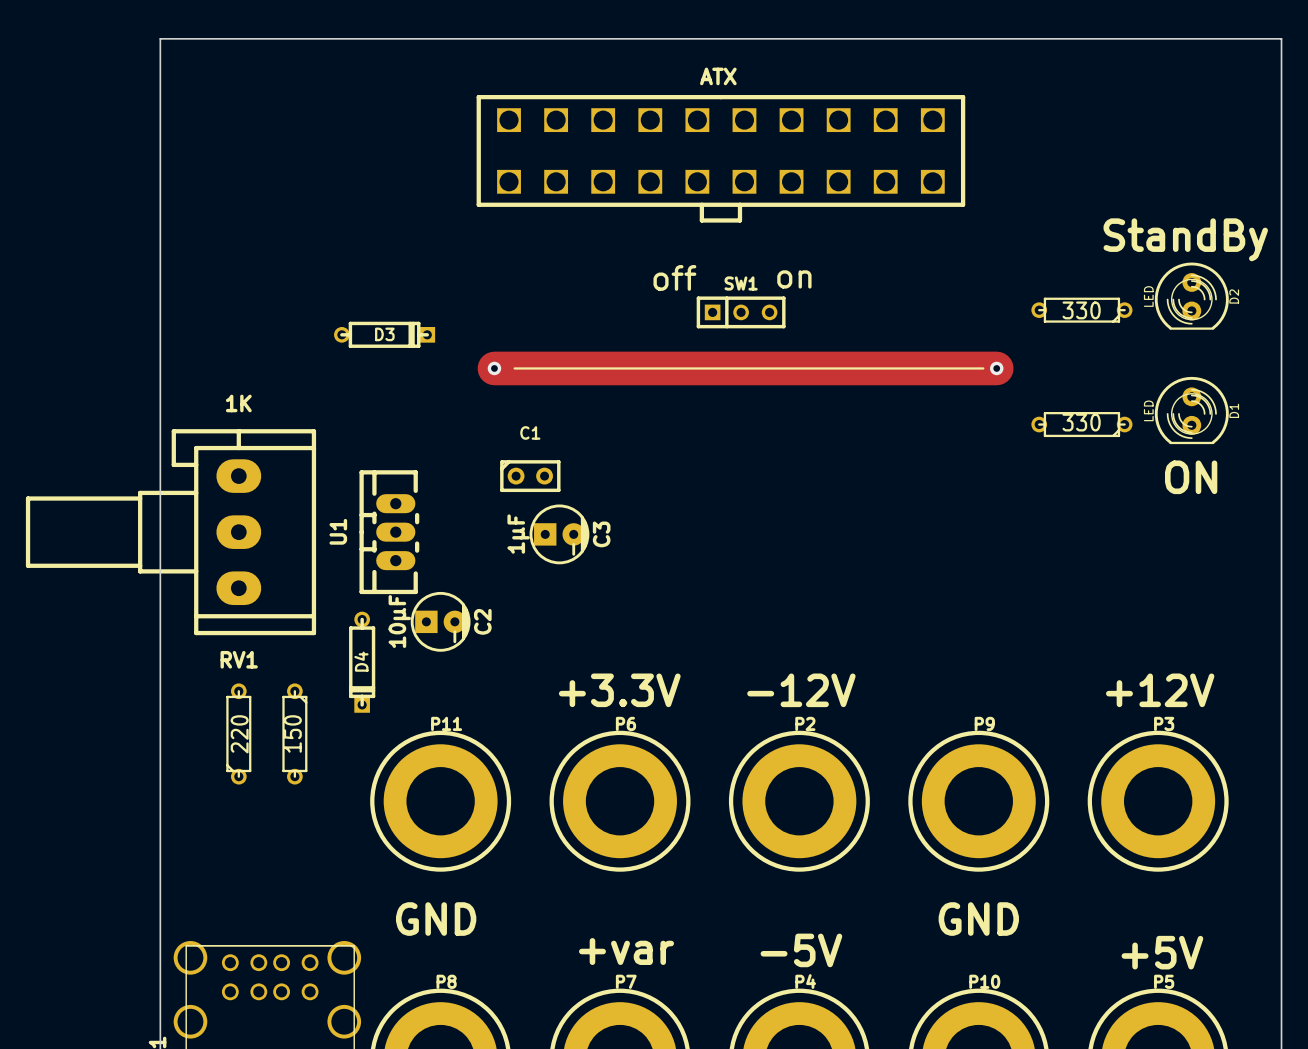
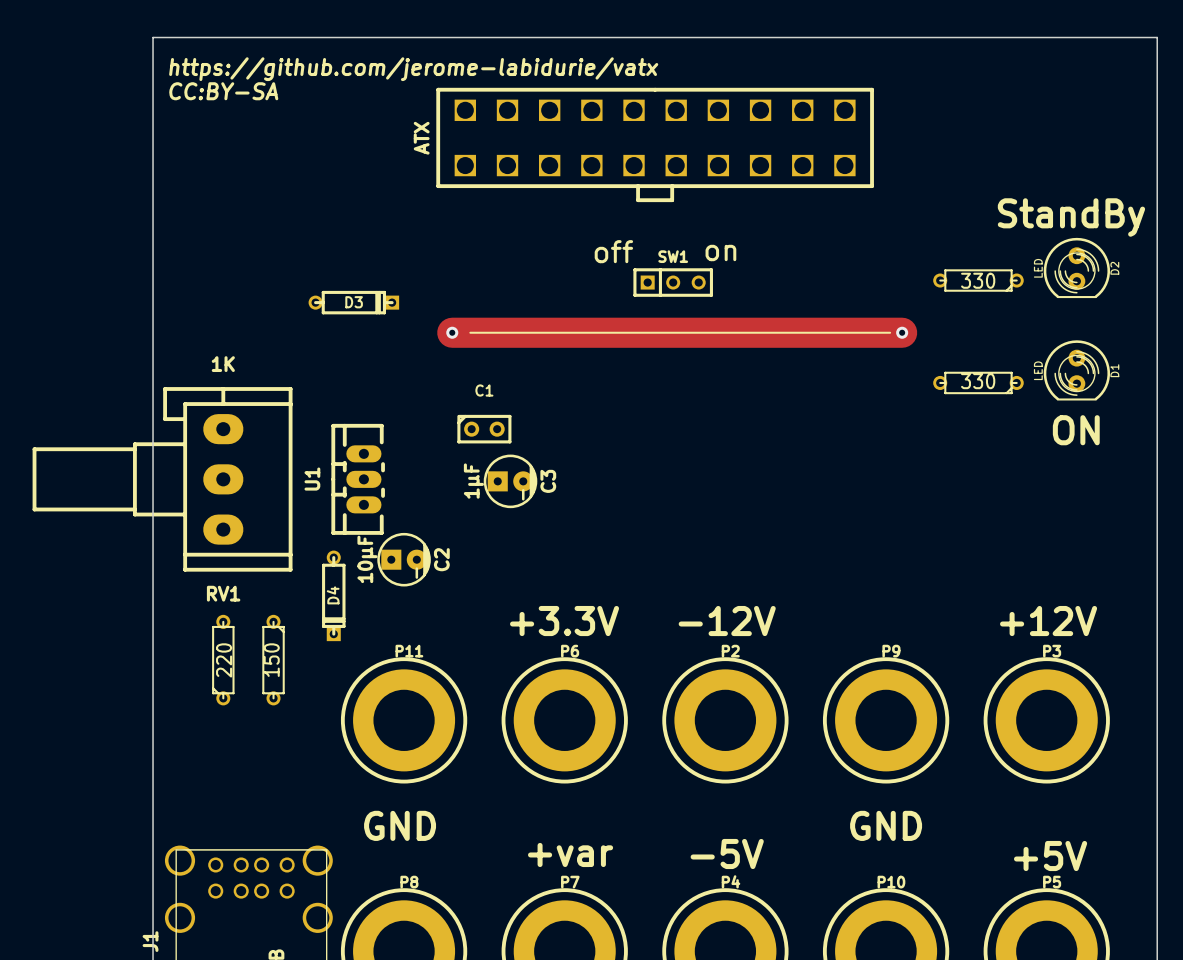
text: none -> https://github.com/jerome-labidurie/vatx (413, 69)
part value rotation: 0° (718, 76) -> 90° counterclockwise (421, 138)
part value position: ATX (718, 76) -> ATX (421, 138)
text: none -> CC:BY-SA (223, 91)

